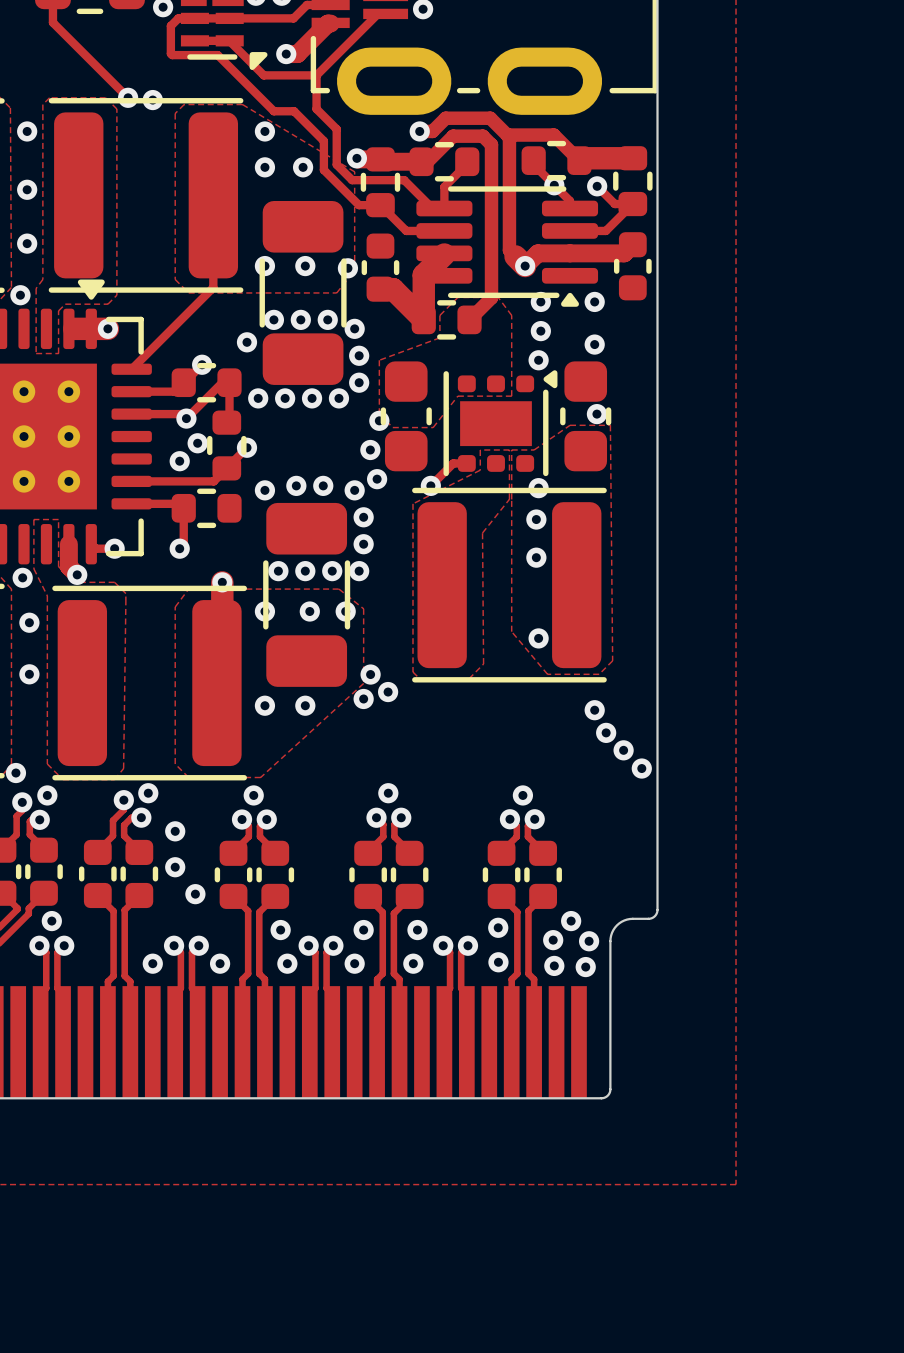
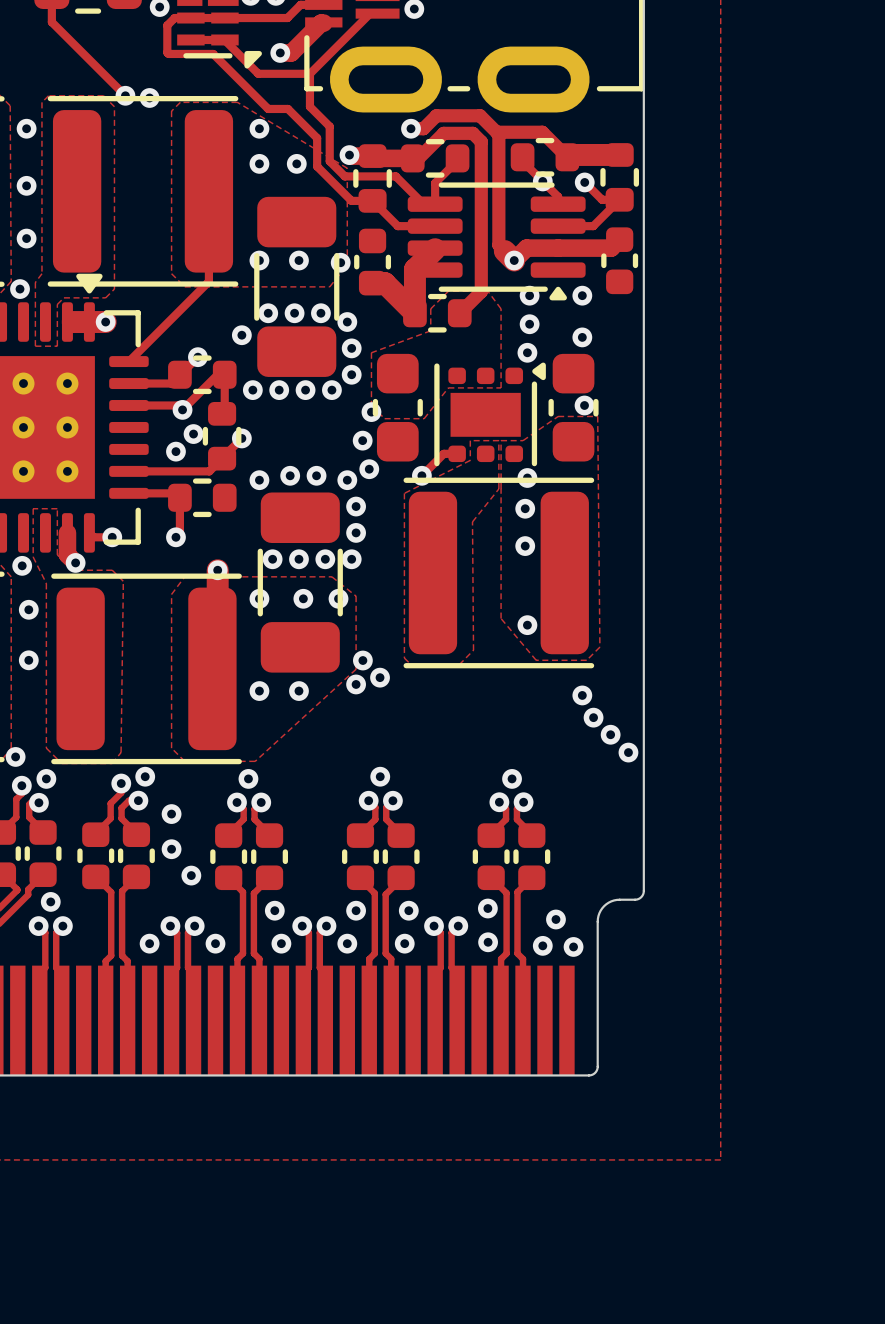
via: (571, 921) -> none
via: none -> (555, 919)
via: (553, 940) -> none
via: (589, 941) -> none

